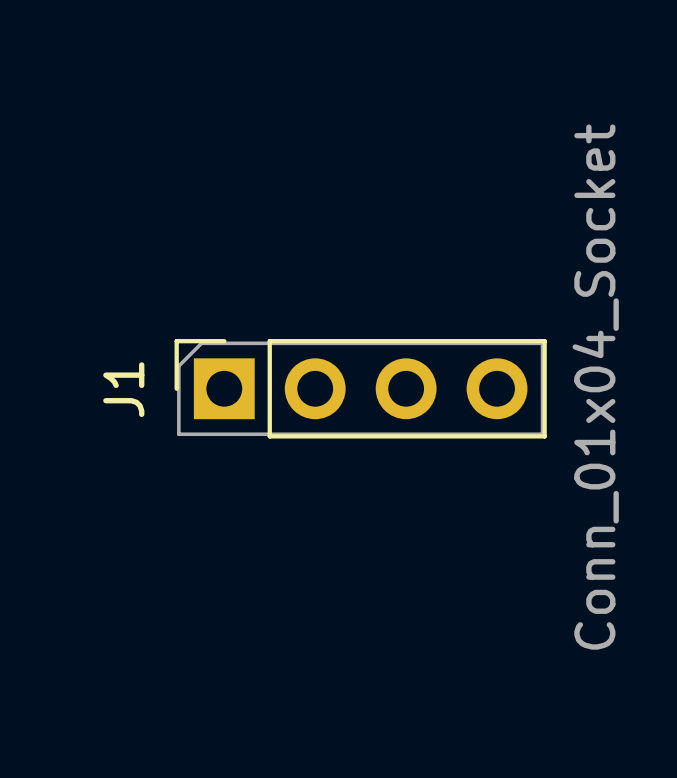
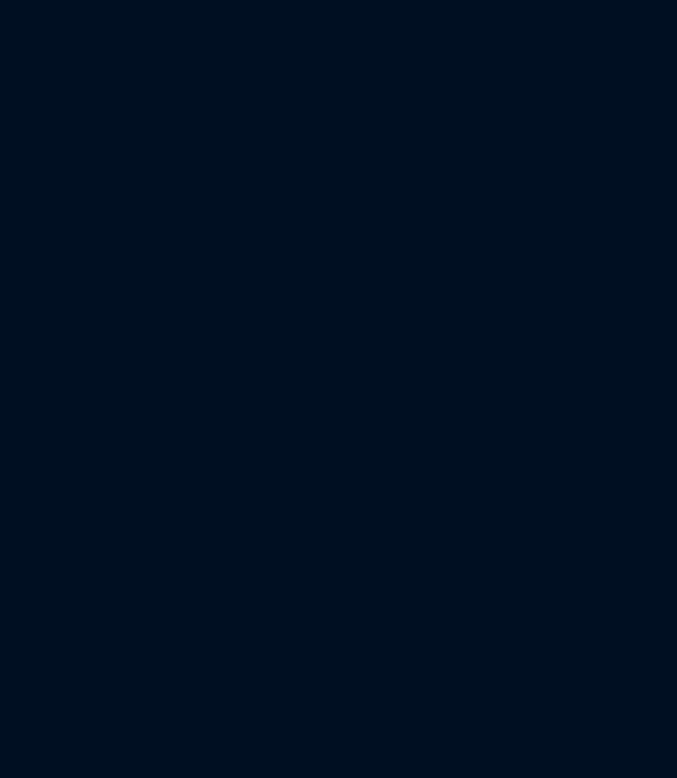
J1: Conn_01x04_Socket (360, 388) -> none

